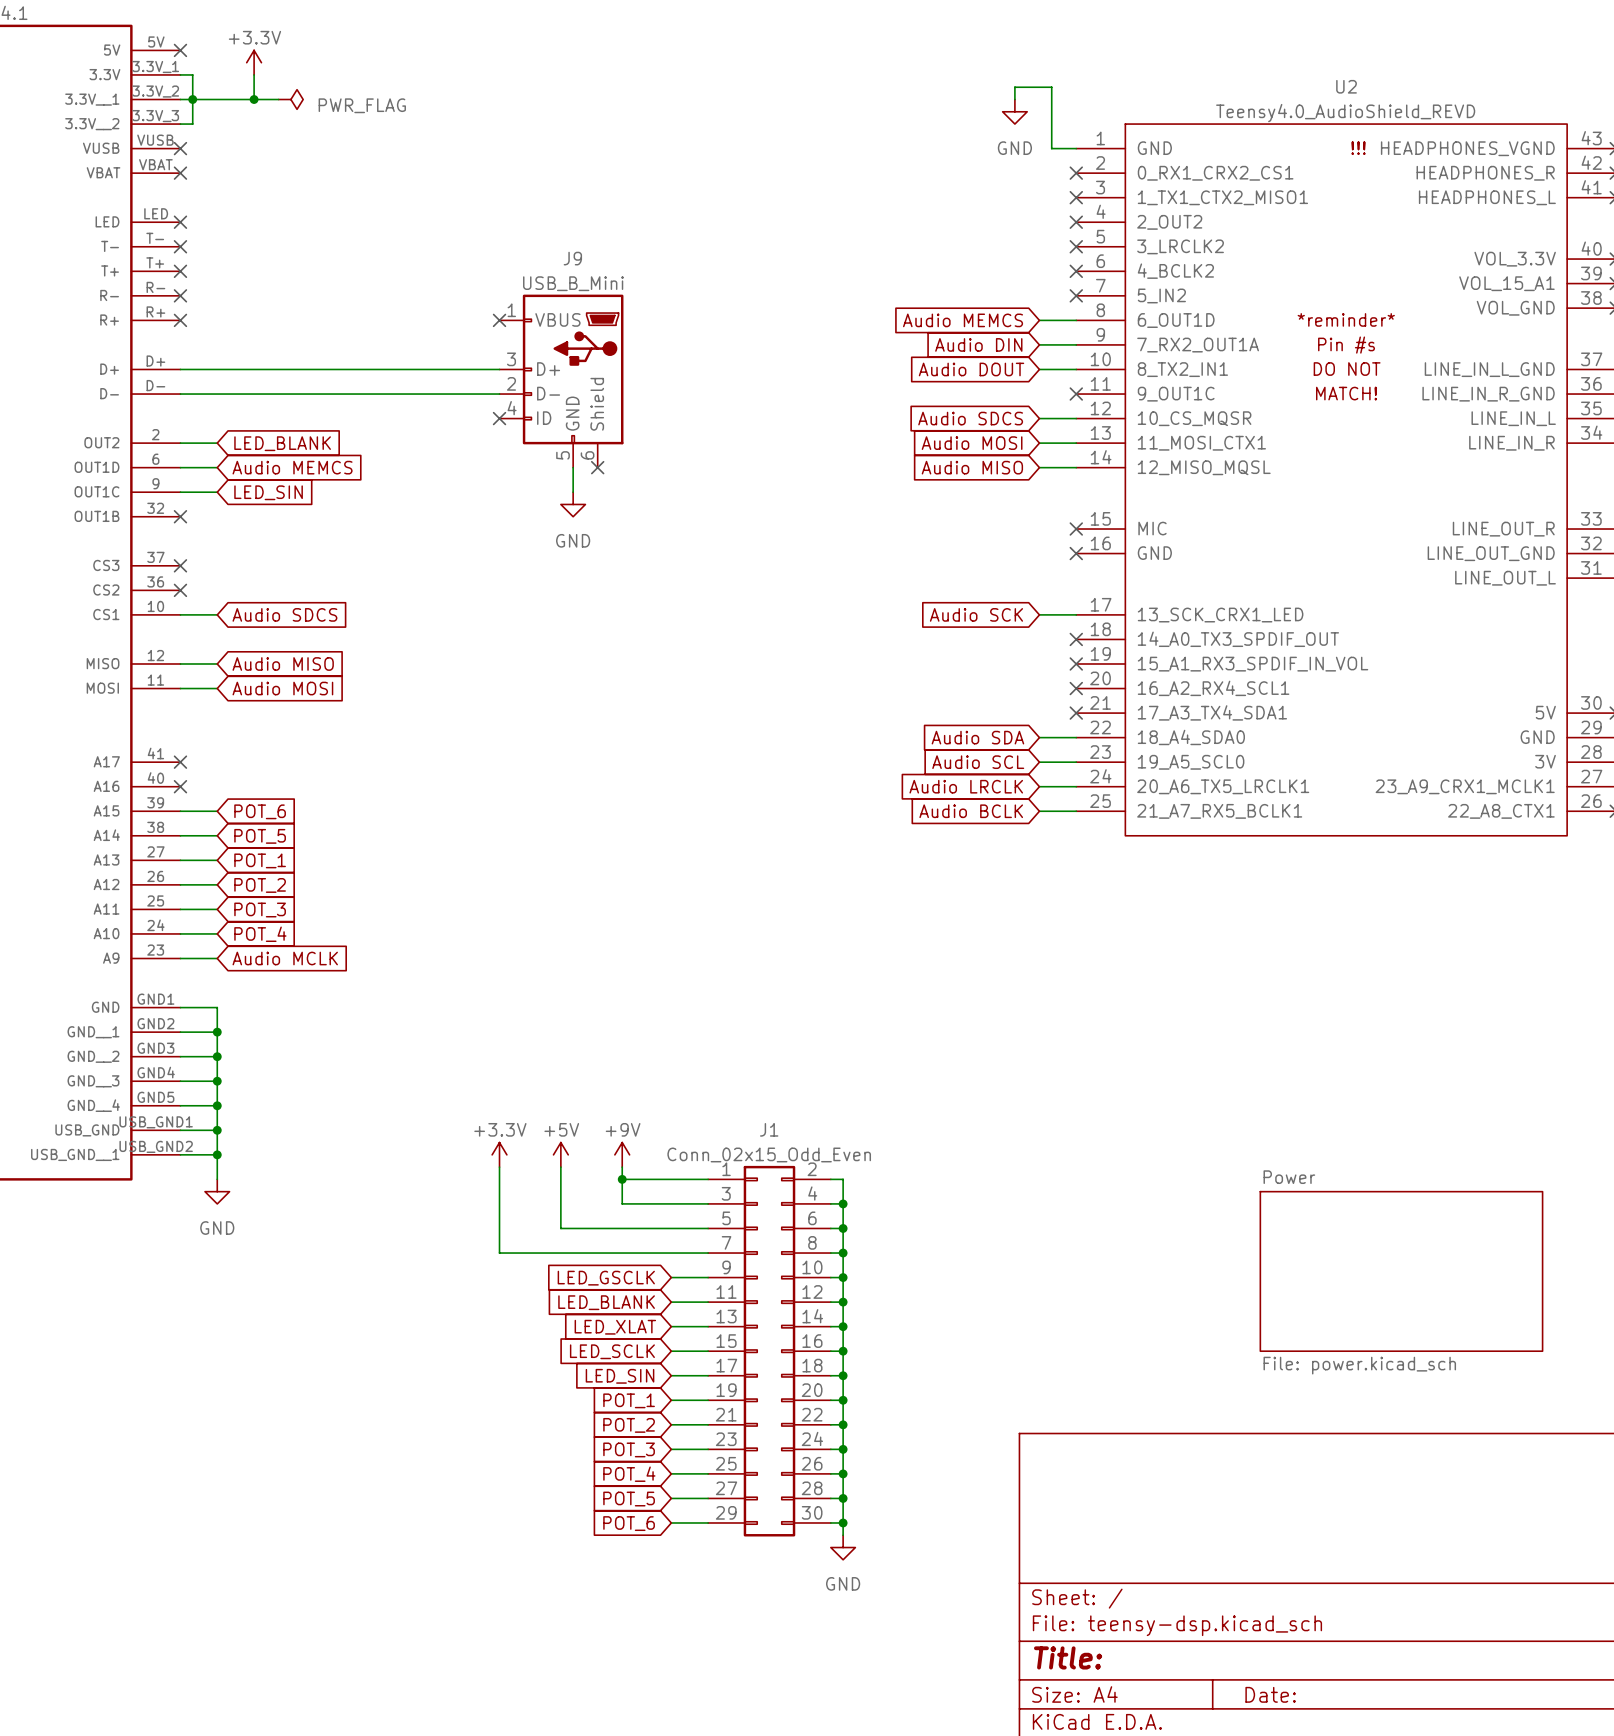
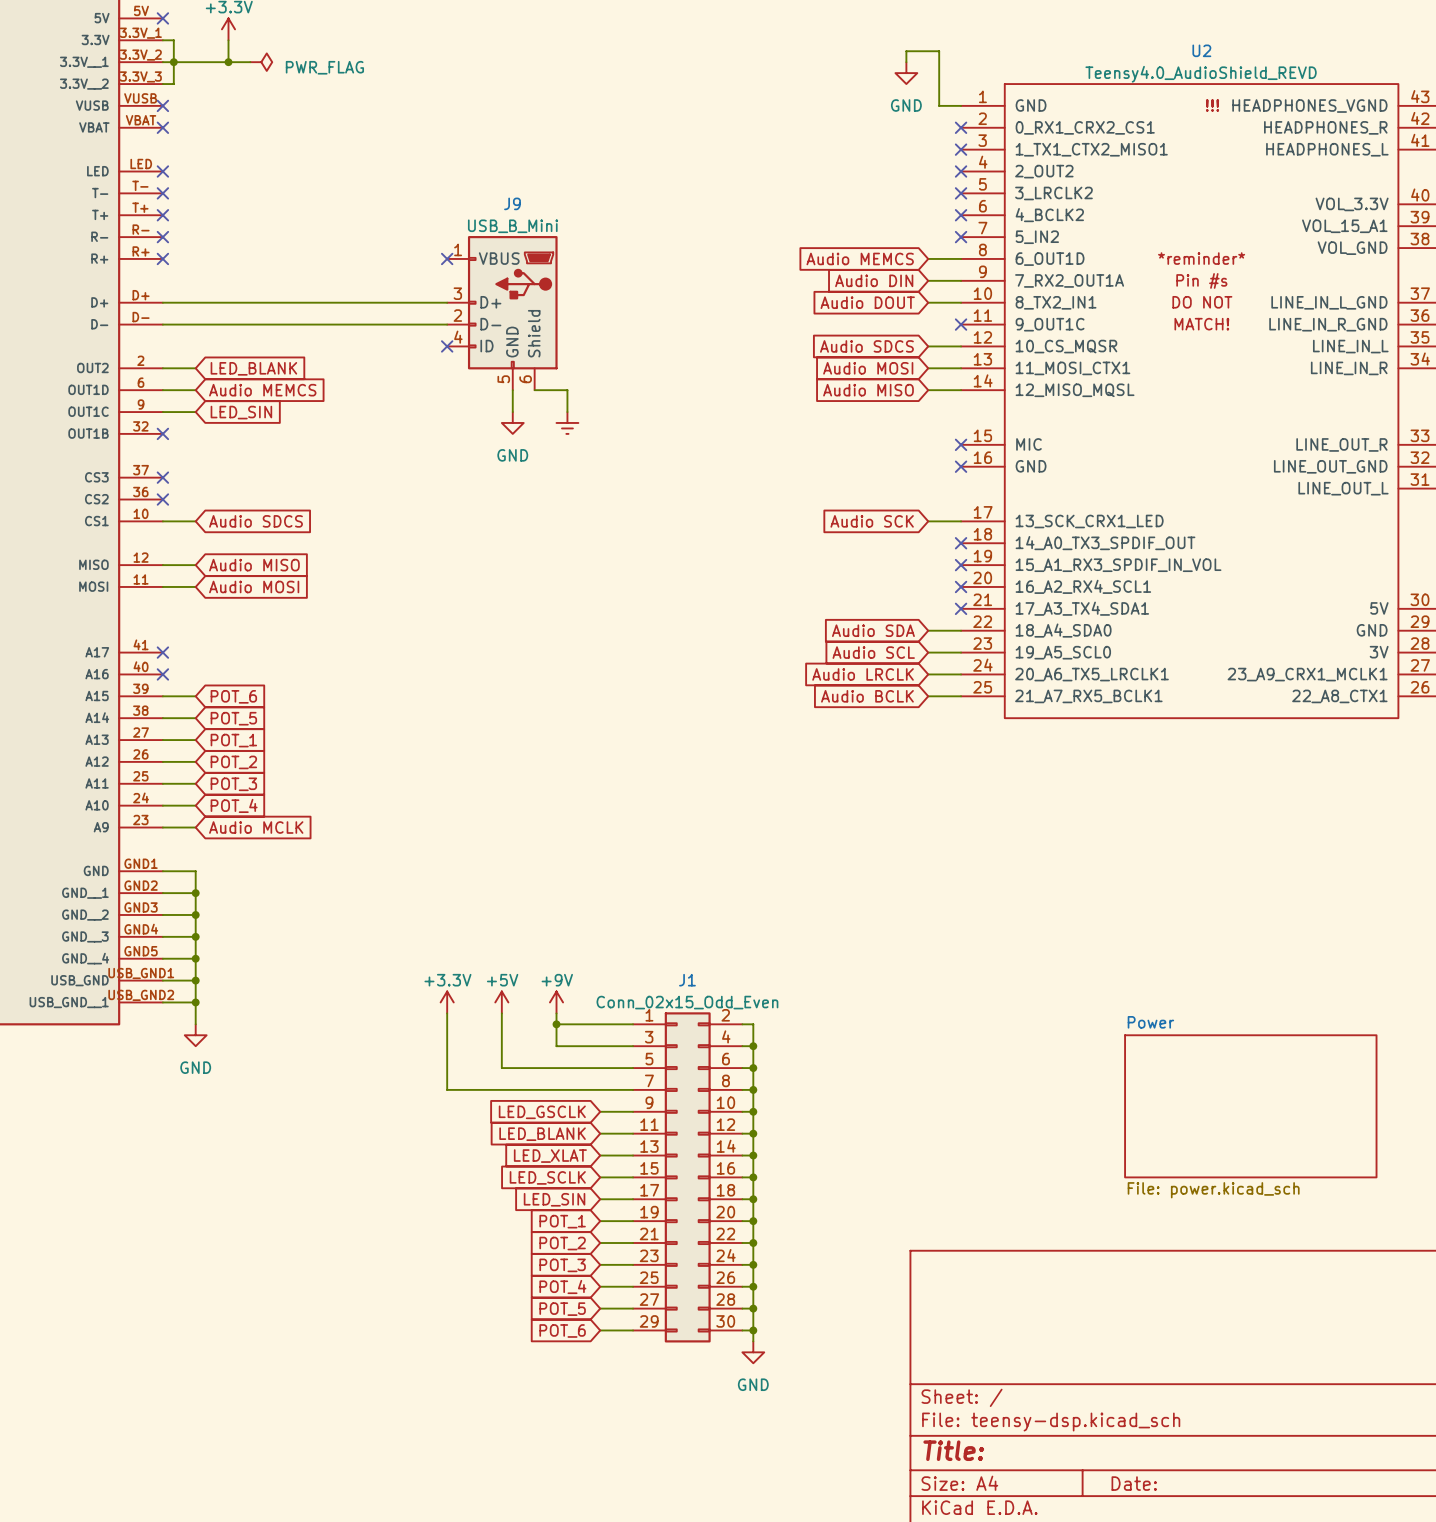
wire: none -> (534, 390) (567, 390) (567, 412)
no-connect mark: (597, 467) -> none
power symbol: none -> (567, 422)

